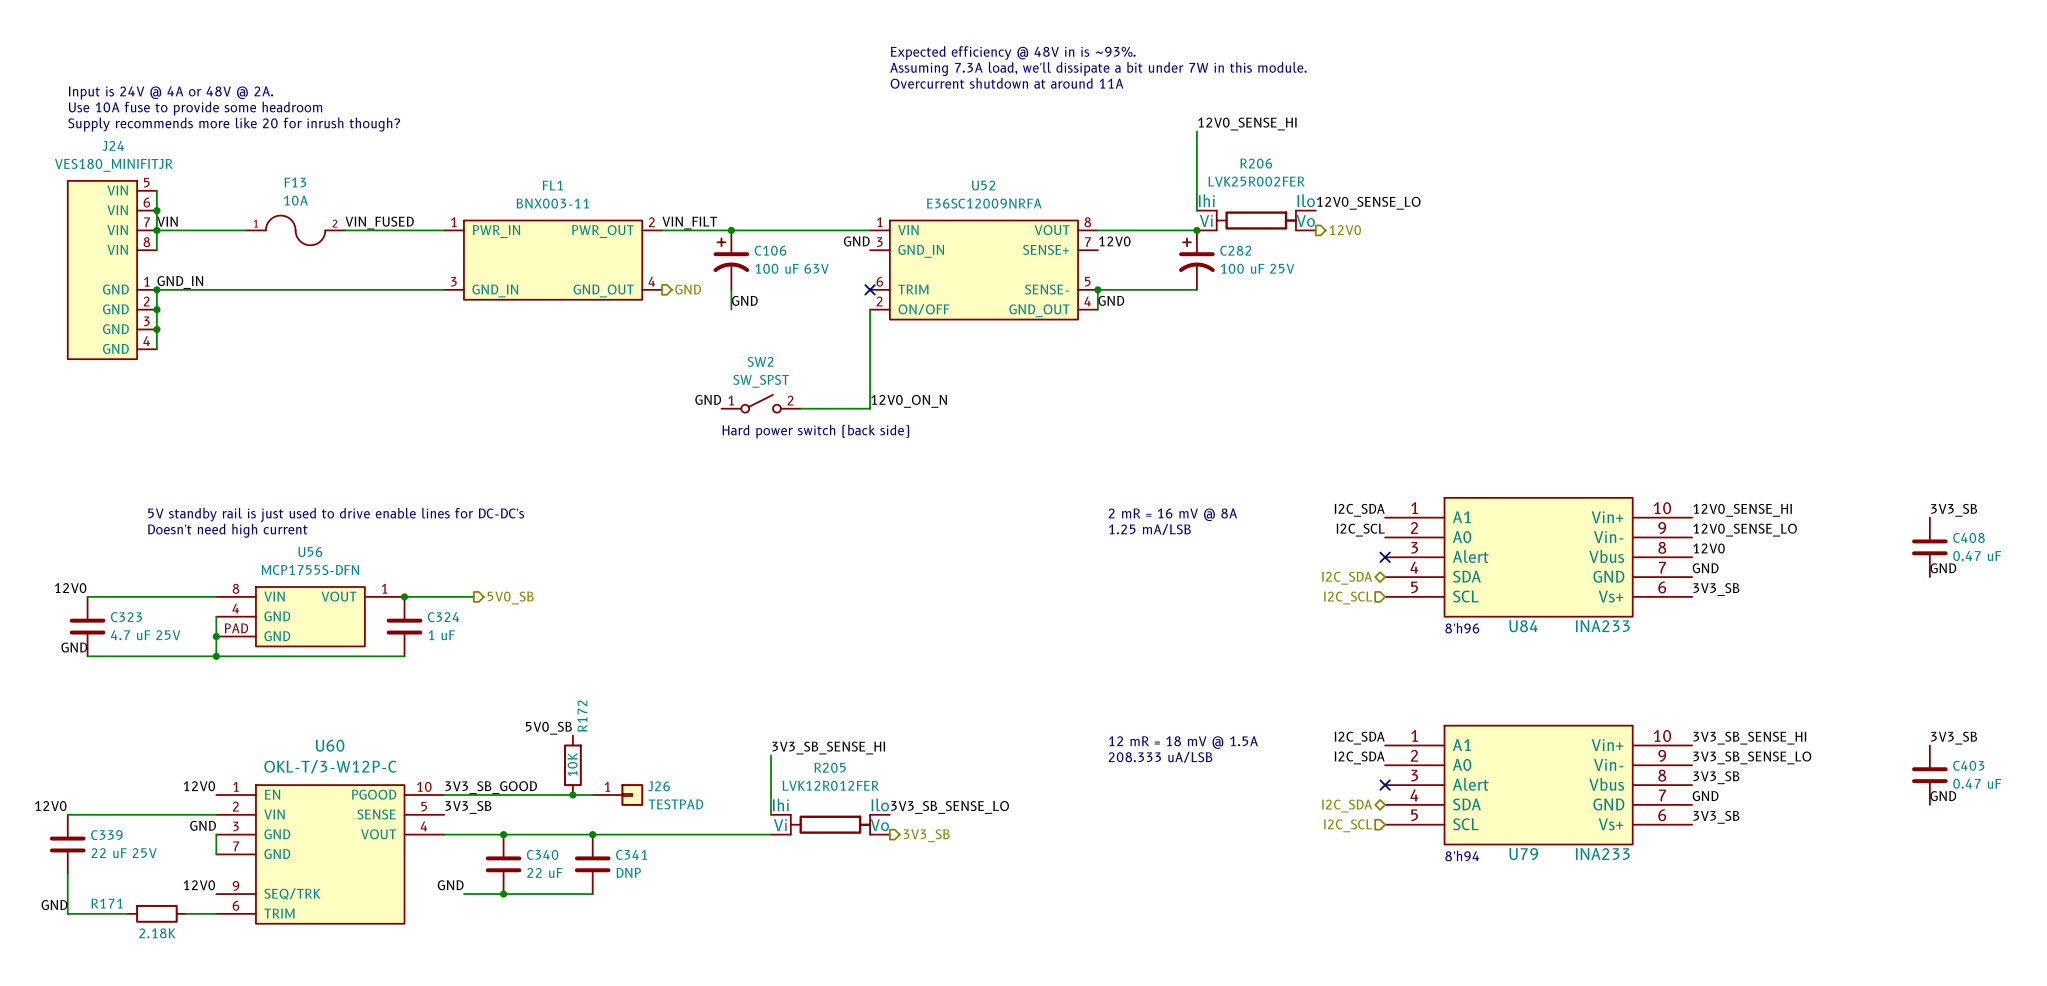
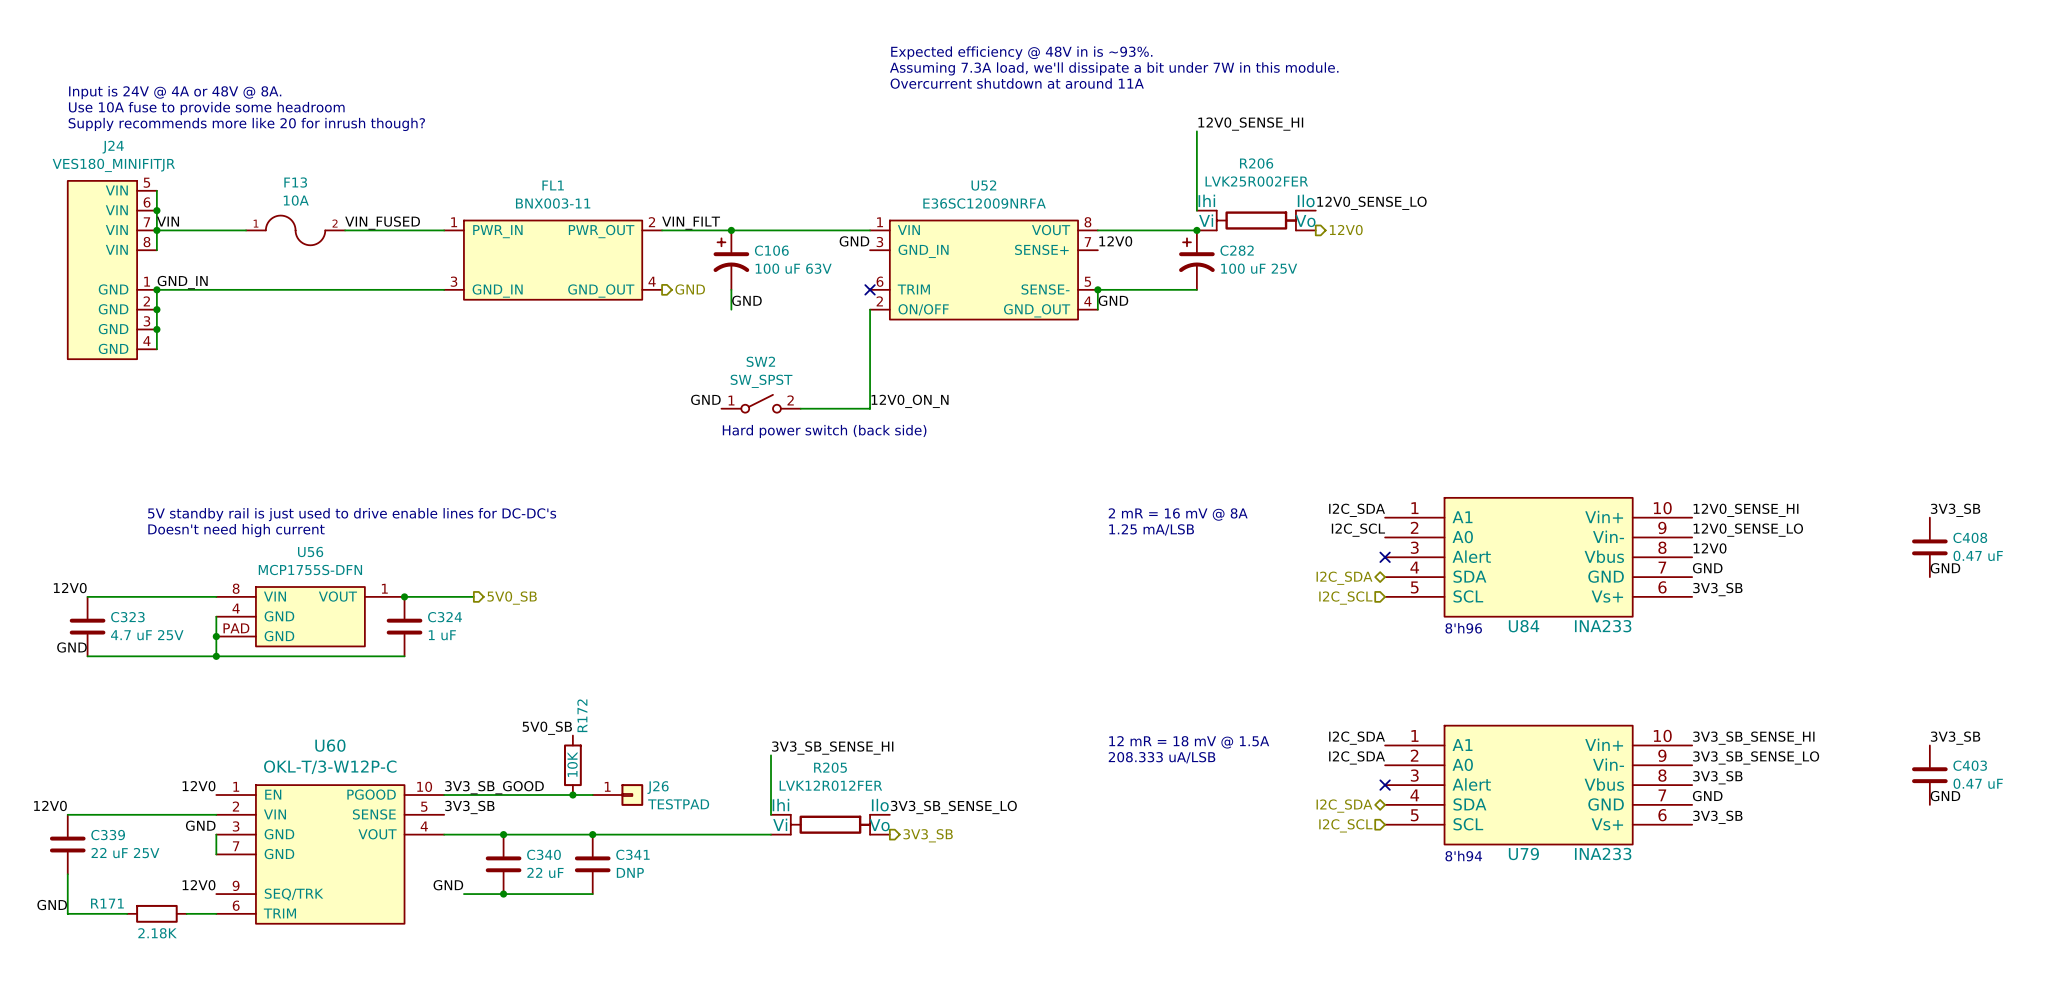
text: Input is 24V @ 4A or 48V @ 2A. (170, 92) -> Input is 24V @ 4A or 48V @ 8A. (175, 92)

